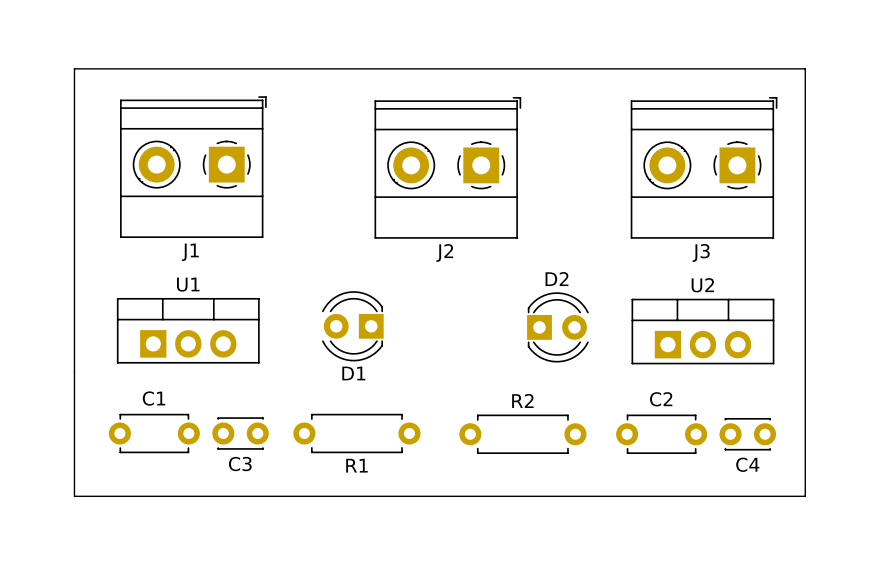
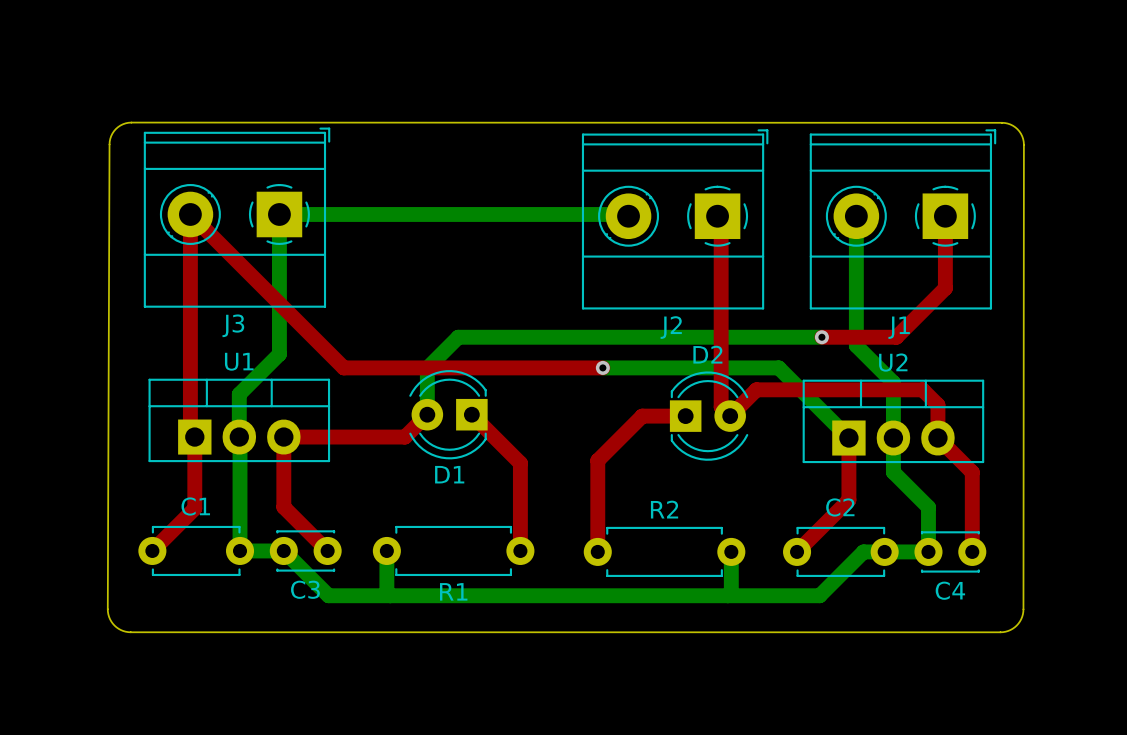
board edge: (74, 68) (74, 496) (805, 496) (805, 68) (74, 68) -> (131, 122) (123, 124) (115, 128) (111, 136) (109, 144) (107, 609) (110, 619) (118, 628) (130, 632) (1000, 632) (1012, 628) (1019, 621) (1023, 609) (1023, 144) (1020, 133) (1012, 125) (1002, 122) (131, 122)
J1 position: (193, 167) -> (902, 219)
J2 position: (447, 167) -> (675, 219)
J3 position: (704, 167) -> (237, 217)
bottom track: none -> (628, 216) (626, 214) (279, 214) (279, 354) (239, 394) (240, 550) (283, 550) (328, 595) (819, 595) (863, 551) (928, 551) (928, 507) (893, 472) (893, 382) (856, 345) (856, 216)
top track: none -> (717, 216) (721, 219) (721, 407) (730, 416) (756, 389) (922, 389) (937, 405) (937, 438) (972, 472) (972, 551)
top track: none -> (945, 216) (945, 288) (896, 337) (821, 337)
bottom track: none -> (821, 337) (458, 337) (427, 368) (427, 414)
via: none -> (821, 337)
top track: none -> (602, 367) (343, 367) (190, 214) (190, 432) (194, 437) (194, 508) (152, 550)
bottom track: none -> (602, 367) (778, 367) (848, 438)
via: none -> (602, 367)
top track: none -> (427, 414) (405, 437) (283, 437) (283, 507) (327, 550)
top track: none -> (471, 414) (520, 463) (520, 550)
top track: none -> (685, 416) (642, 416) (597, 460) (597, 551)
top track: none -> (848, 438) (848, 500) (797, 551)
bottom track: none -> (386, 550) (386, 592) (390, 595)
bottom track: none -> (731, 551) (731, 592) (727, 595)

